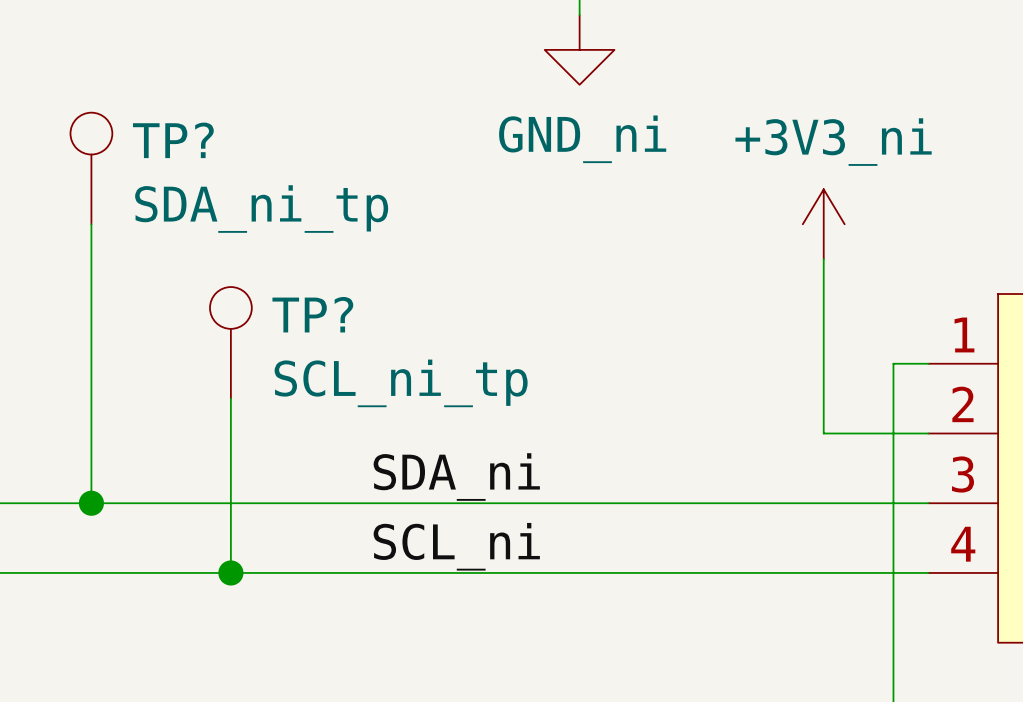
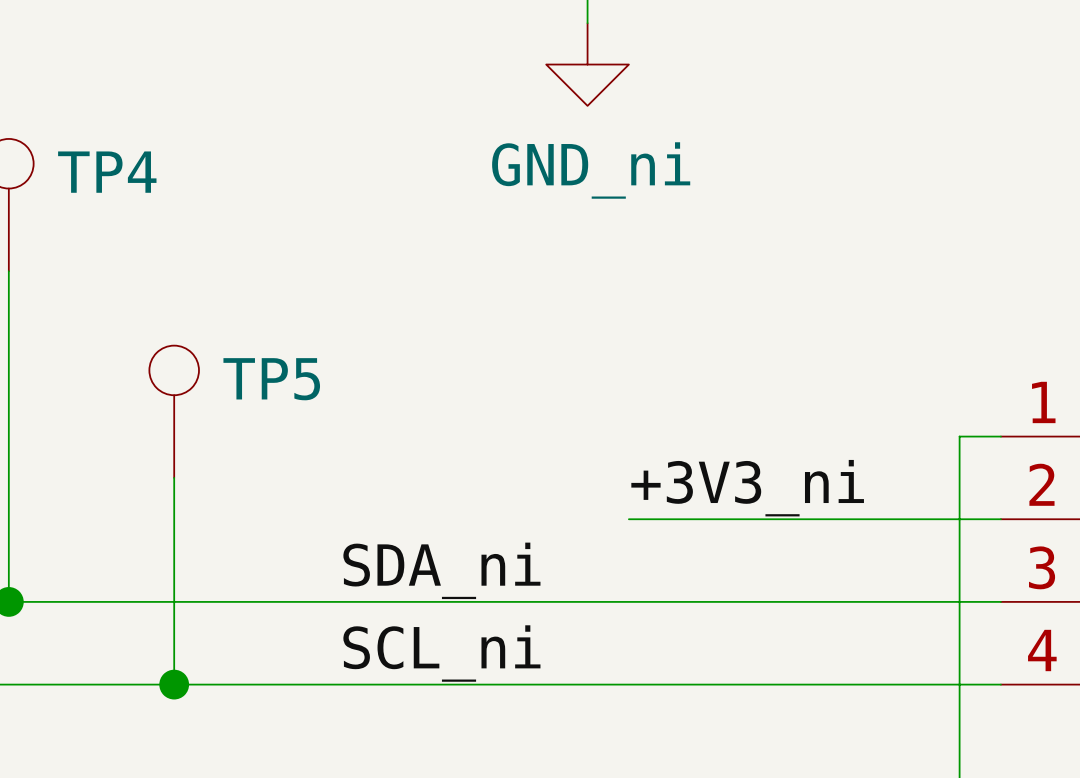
TP? name: TP? (173, 140) -> TP4 (107, 172)
TP? value: SDA_ni_tp (261, 209) -> none
power symbol: +3V3_ni (823, 224) -> none
wire: (823, 259) (823, 433) -> (628, 519) (876, 519)
TP? name: TP? (312, 314) -> TP5 (271, 379)
TP? value: SCL_ni_tp (401, 383) -> none
label: none -> +3V3_ni (747, 488)

